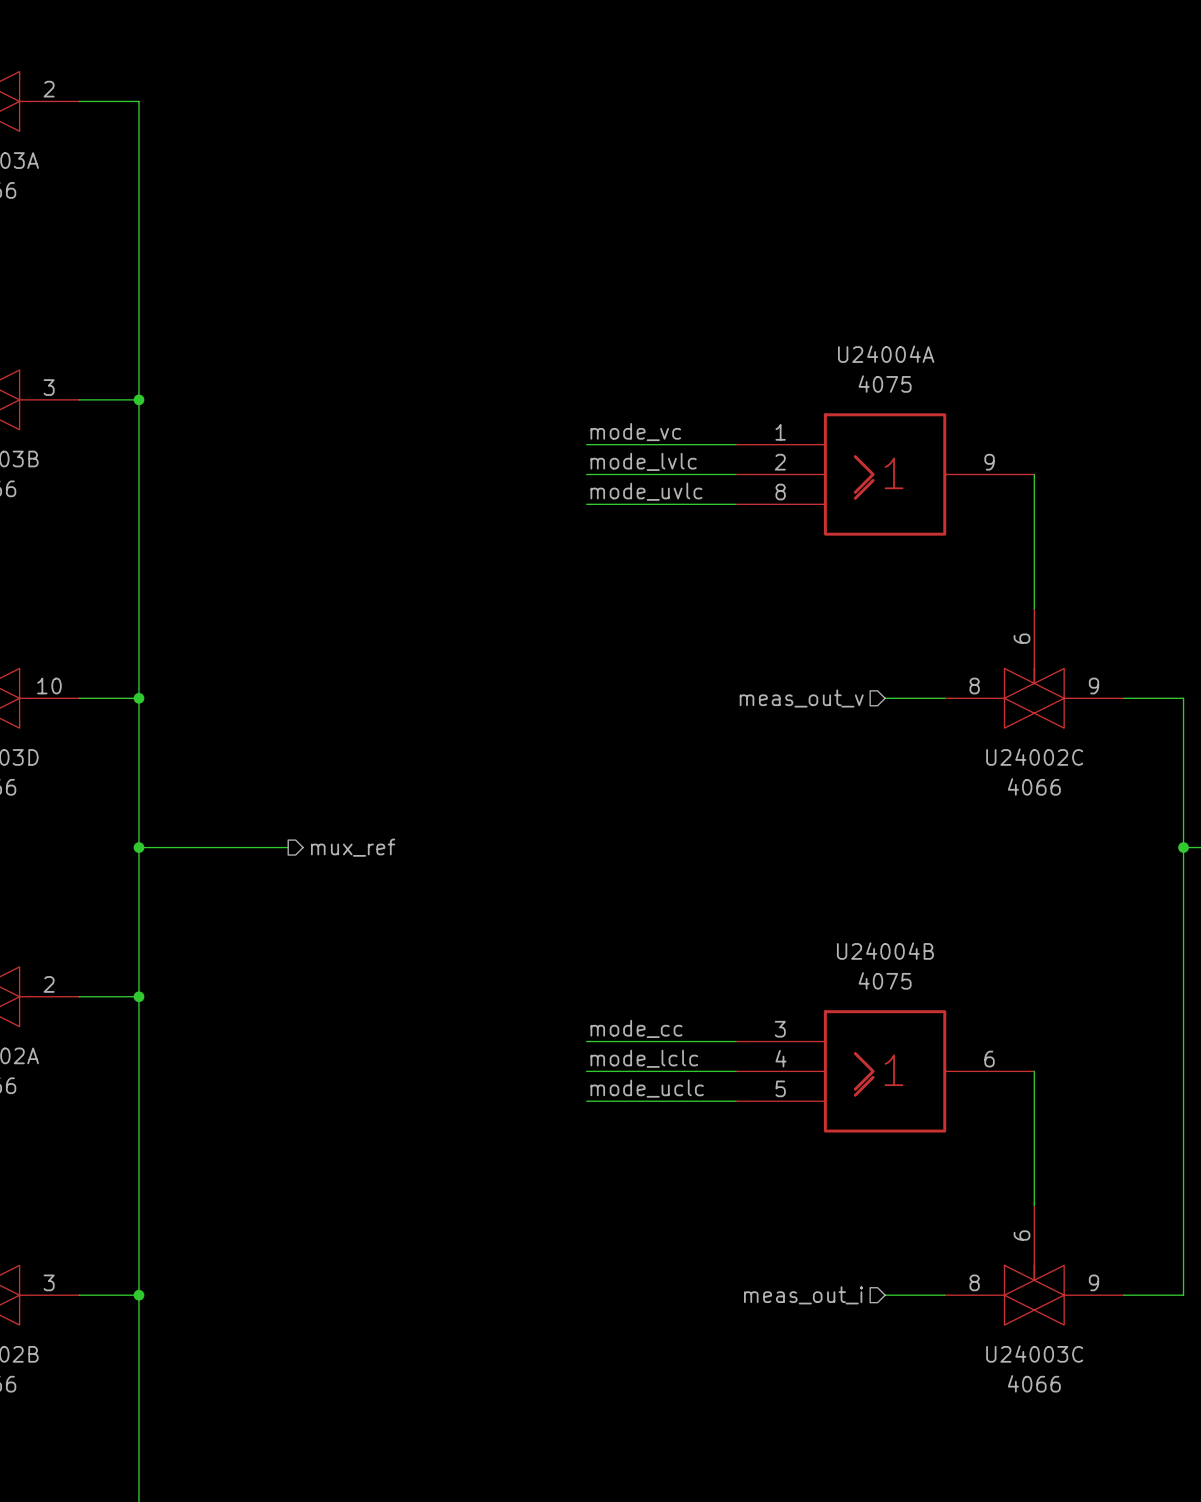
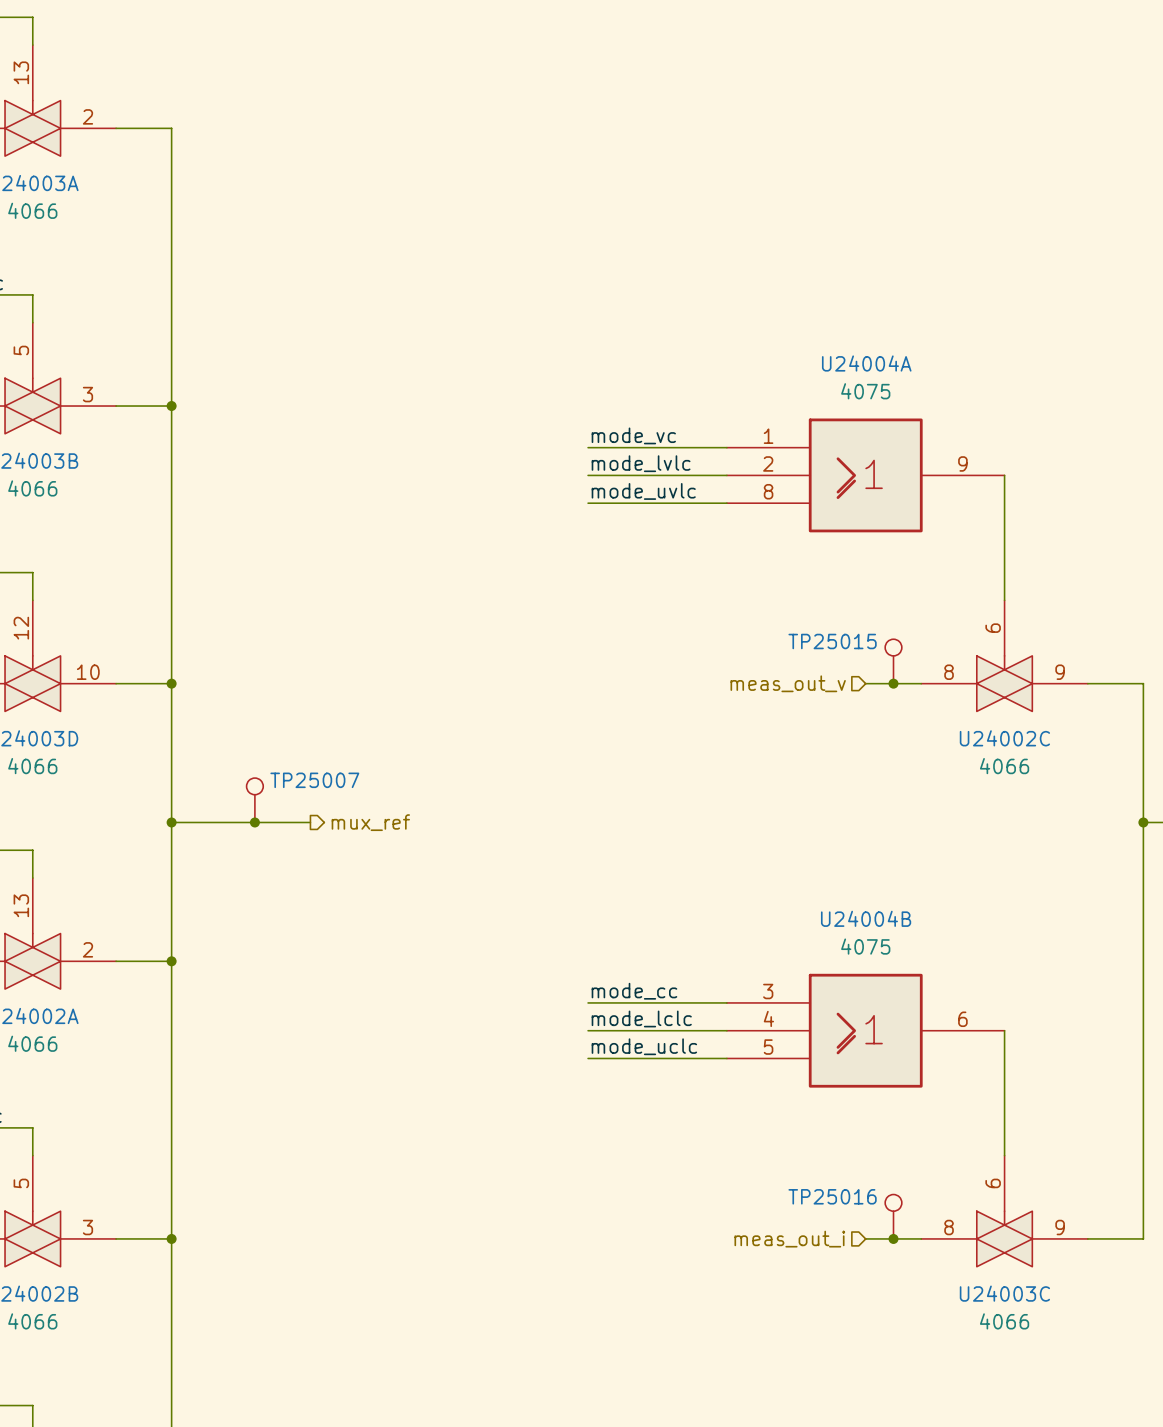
TP25015: none -> (893, 661)
junction: none -> (893, 683)
TP25007: none -> (254, 800)
junction: none -> (254, 822)
TP25016: none -> (893, 1216)
junction: none -> (893, 1238)

